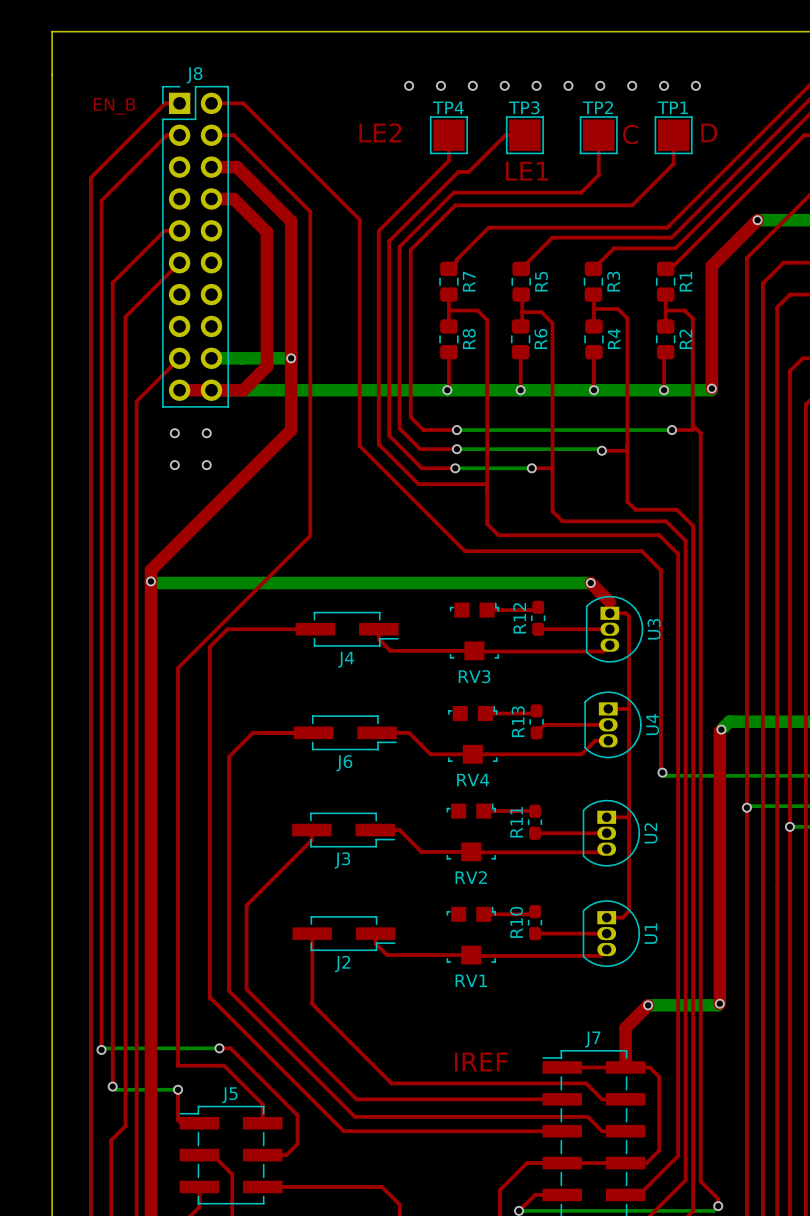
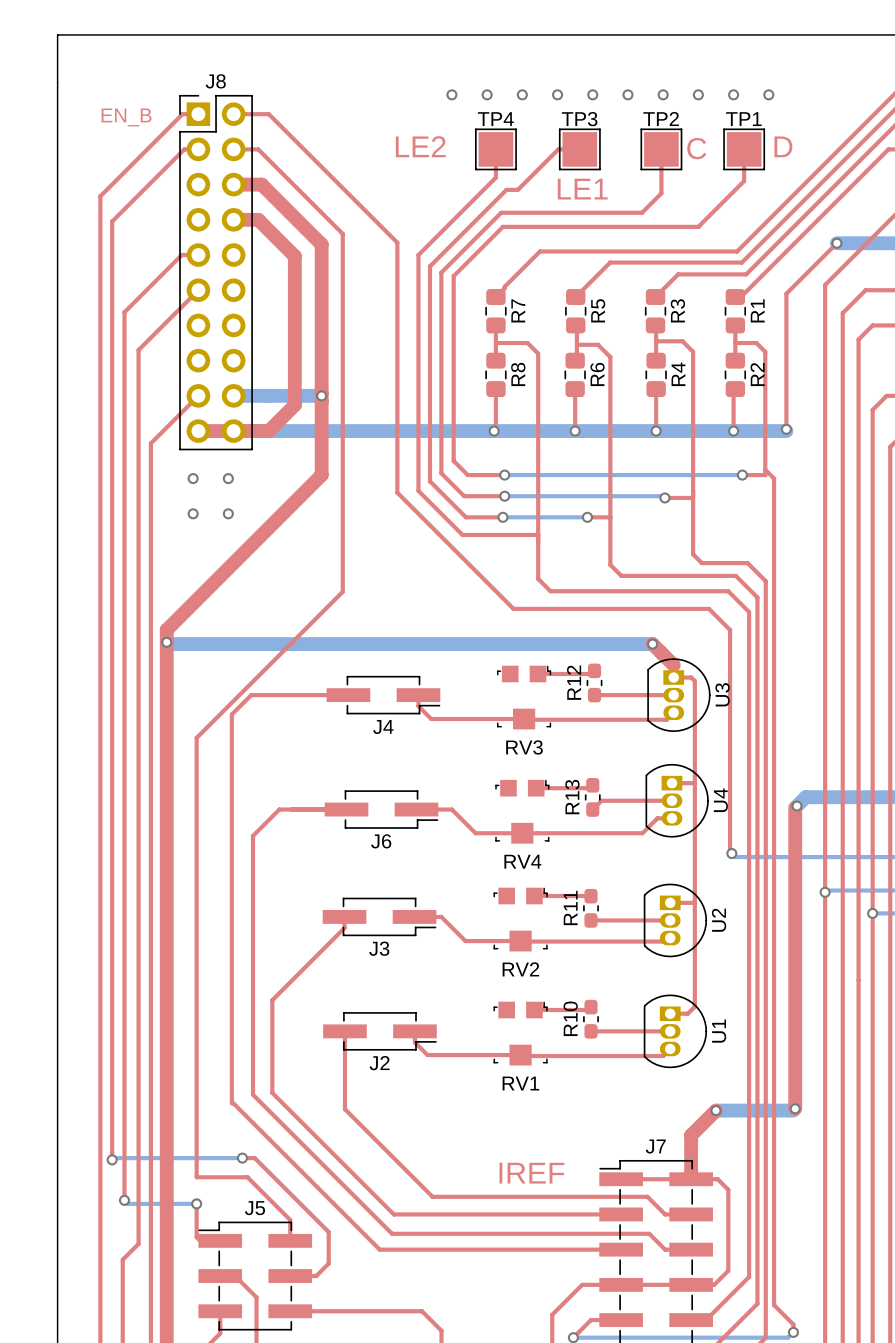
top track width: thick (757, 220) (711, 265) (711, 388) -> thin (836, 243) (786, 293) (786, 429)

